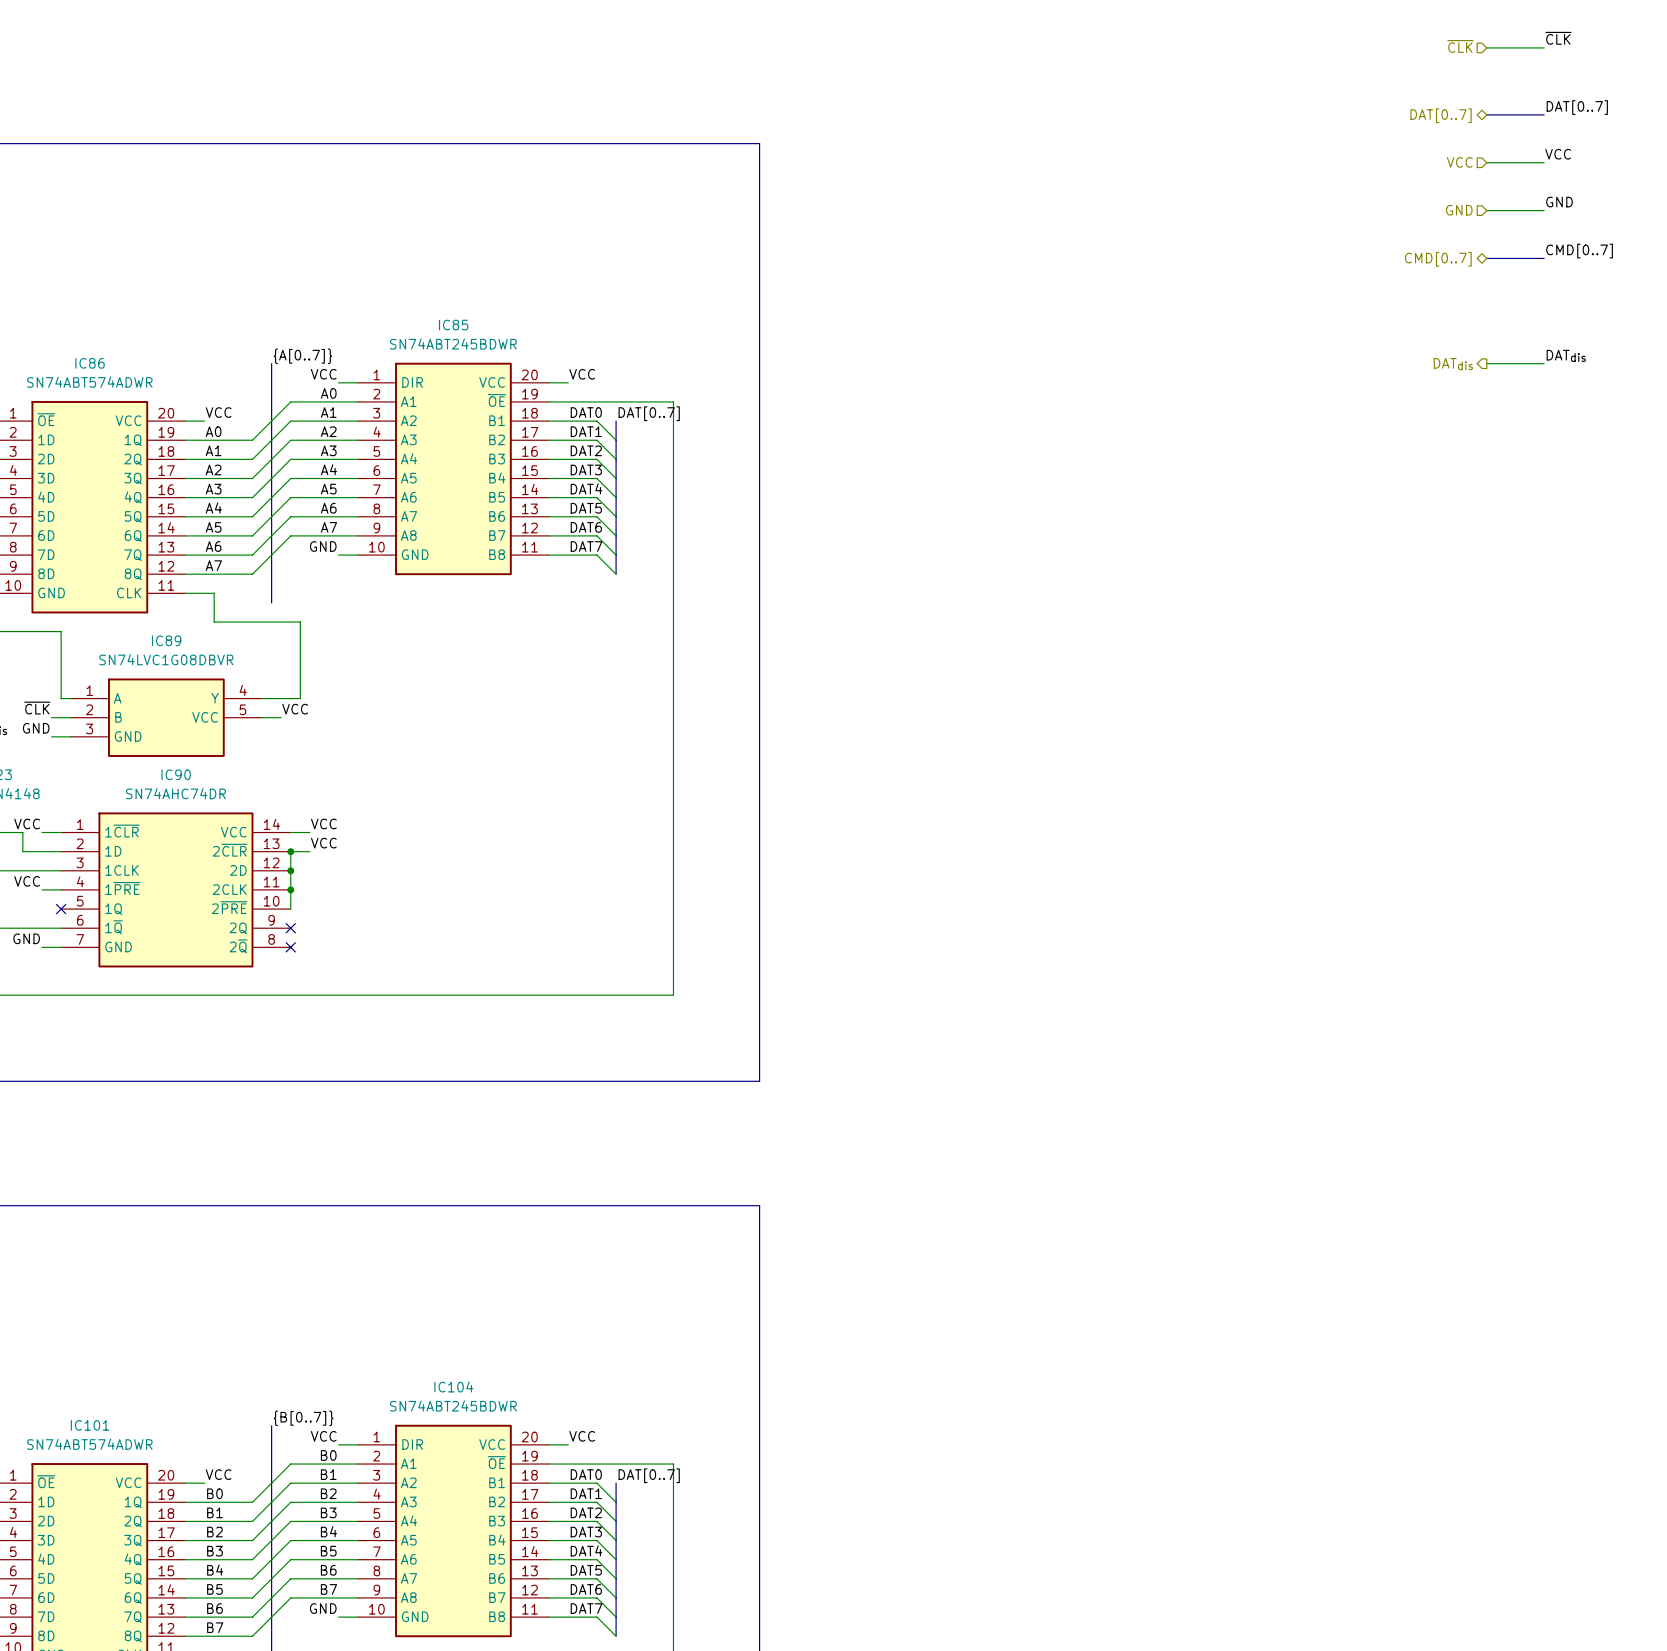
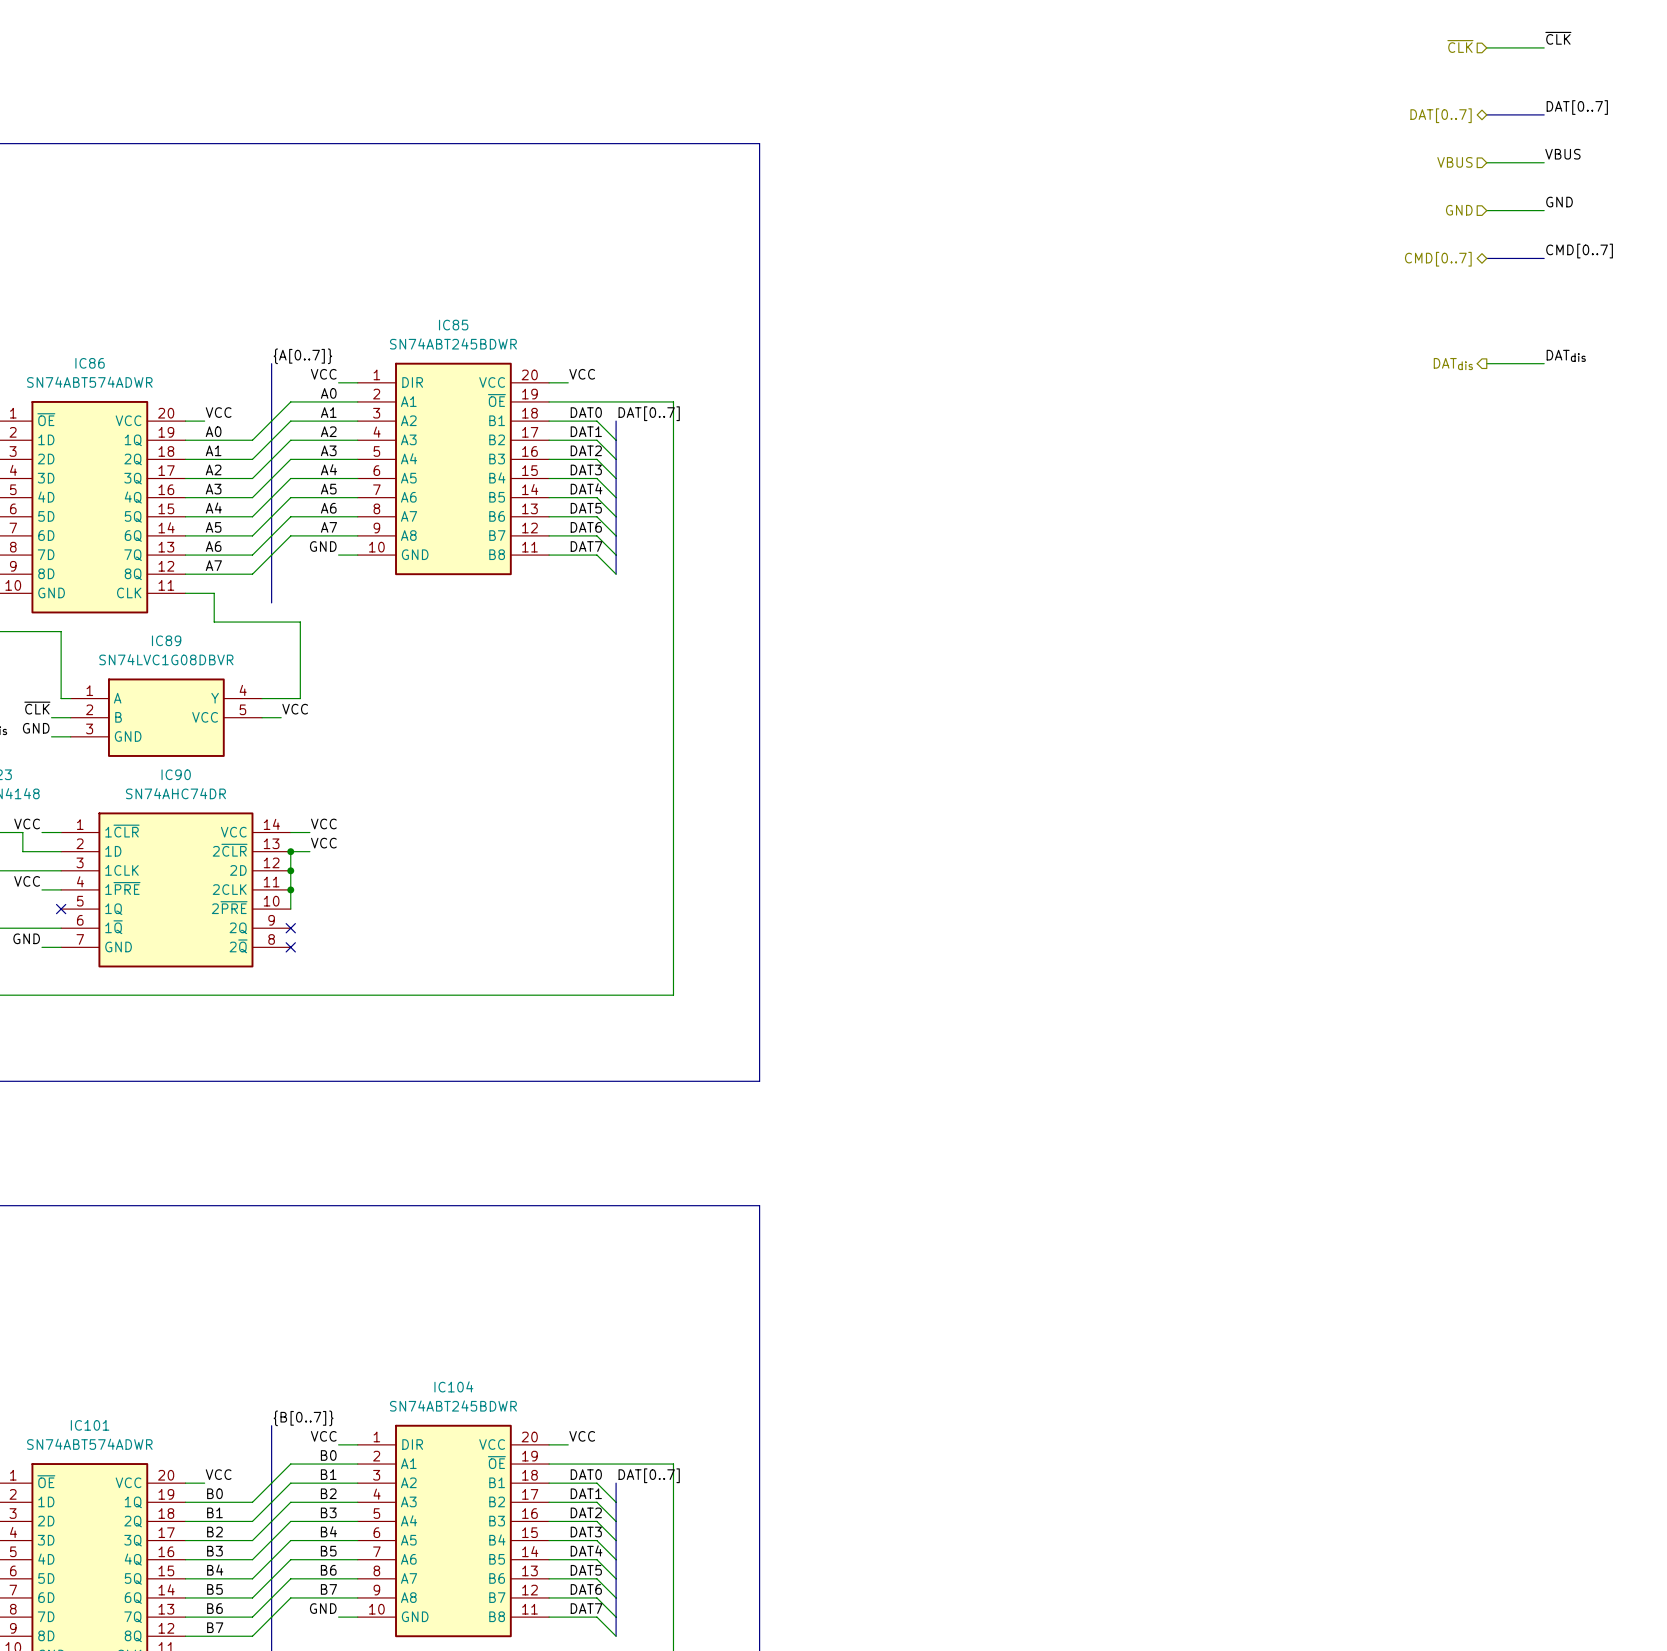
label: VCC (1558, 154) -> VBUS (1562, 154)
hierarchical label: VCC (1459, 162) -> VBUS (1454, 162)

